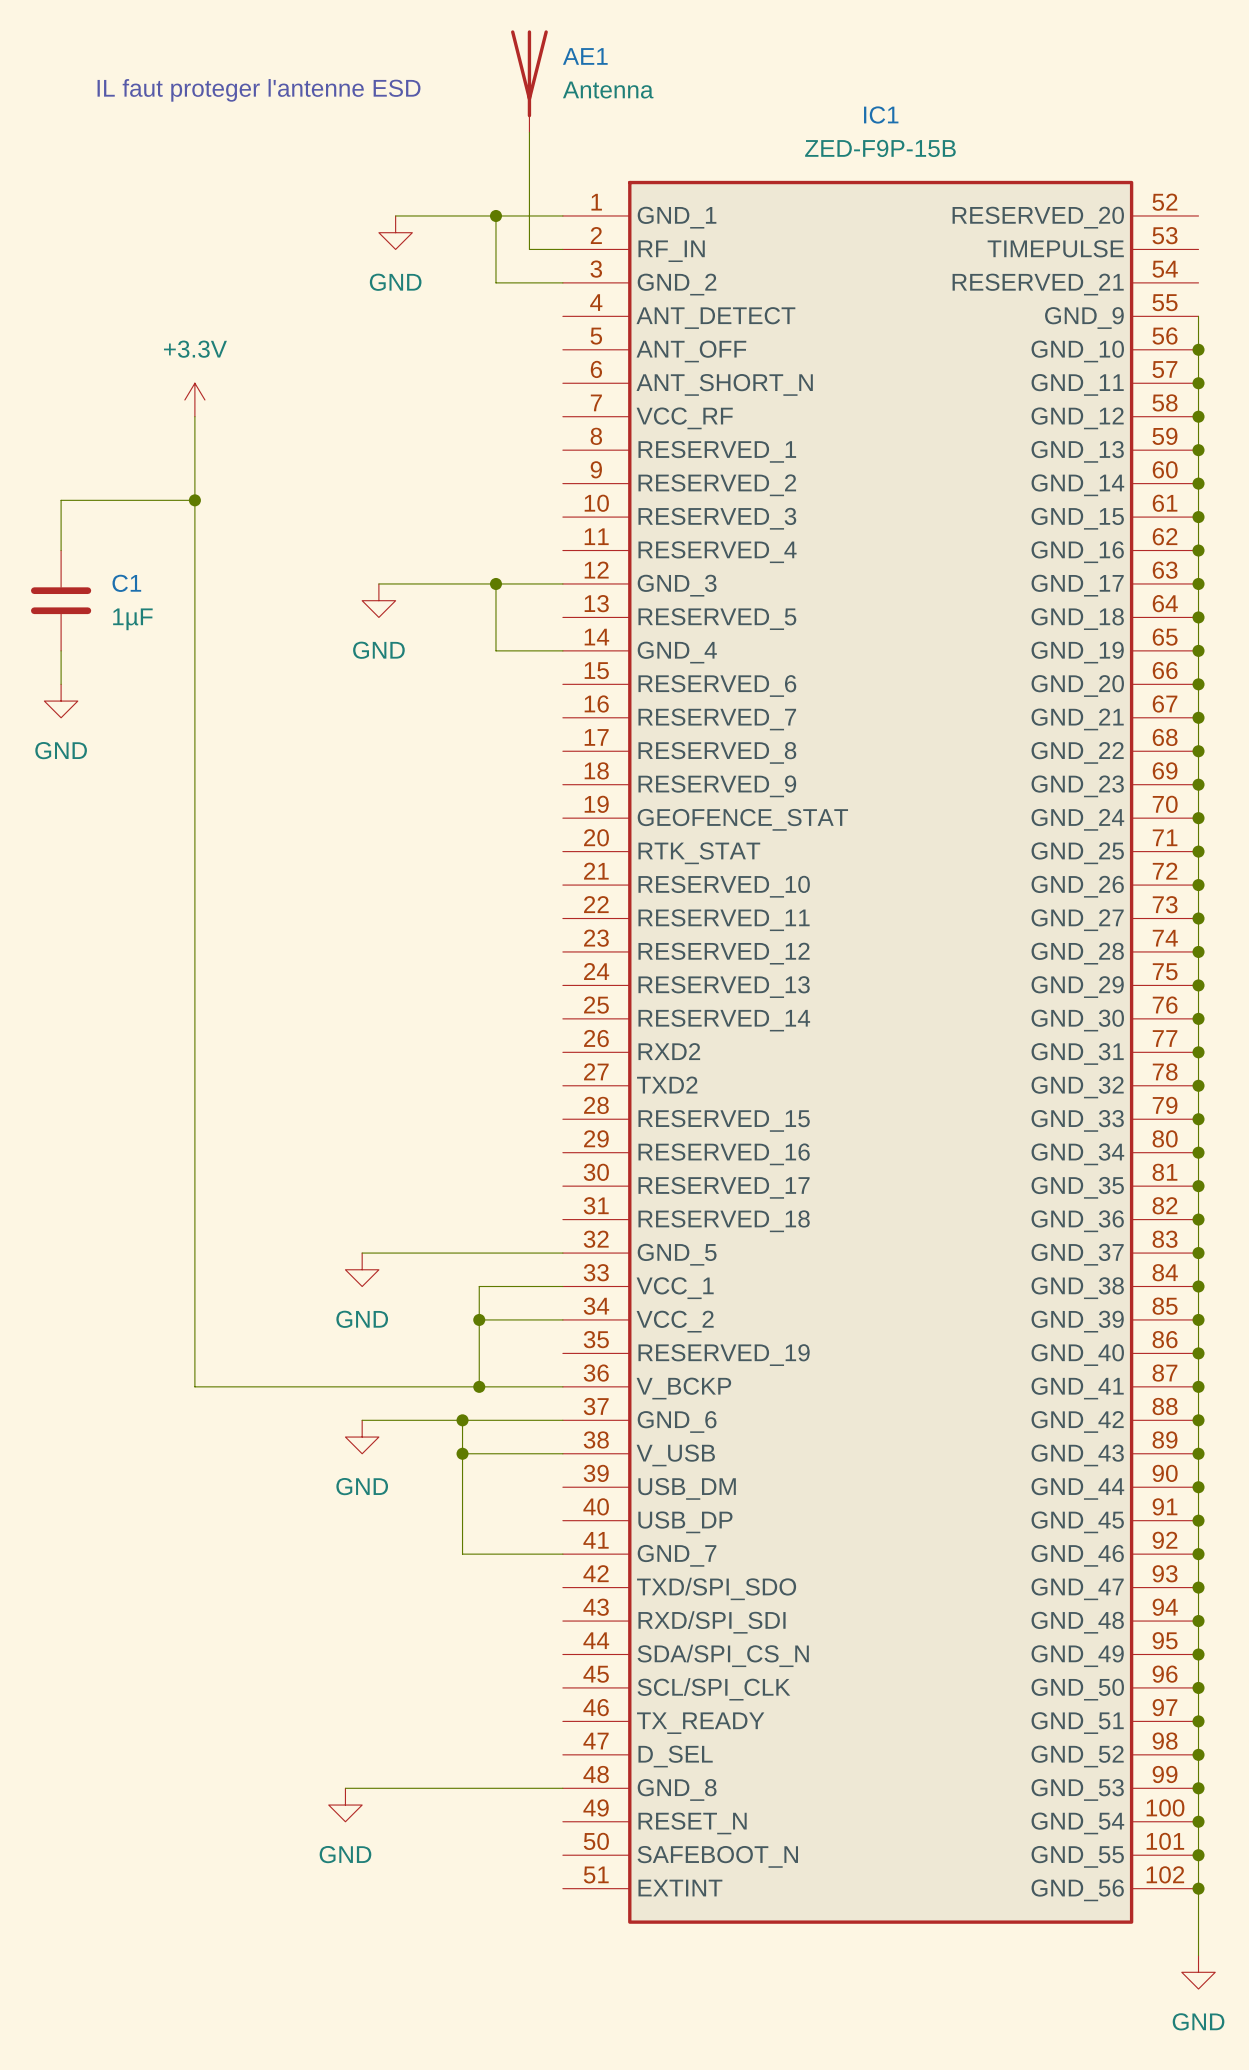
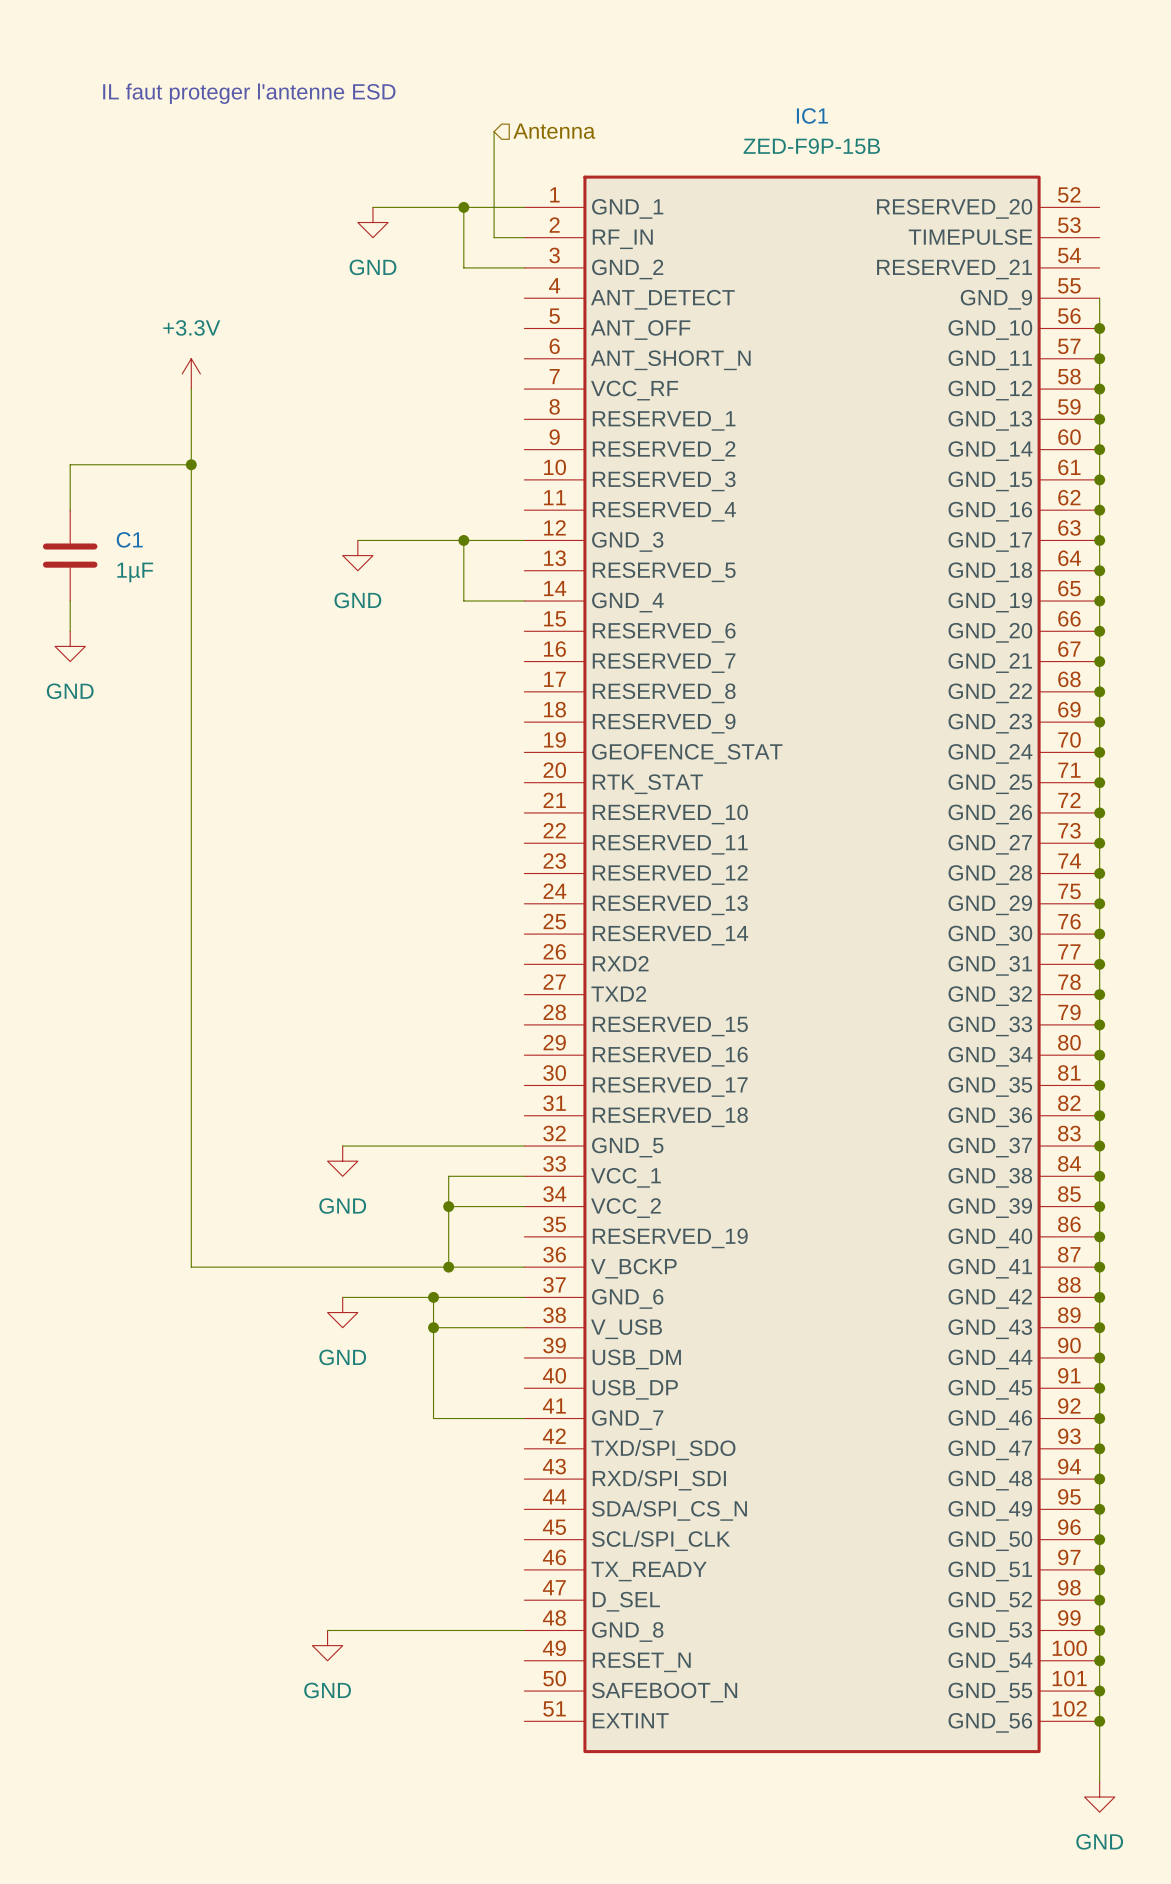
AE1: Antenna (529, 81) -> none
hierarchical label: none -> Antenna (554, 131)

